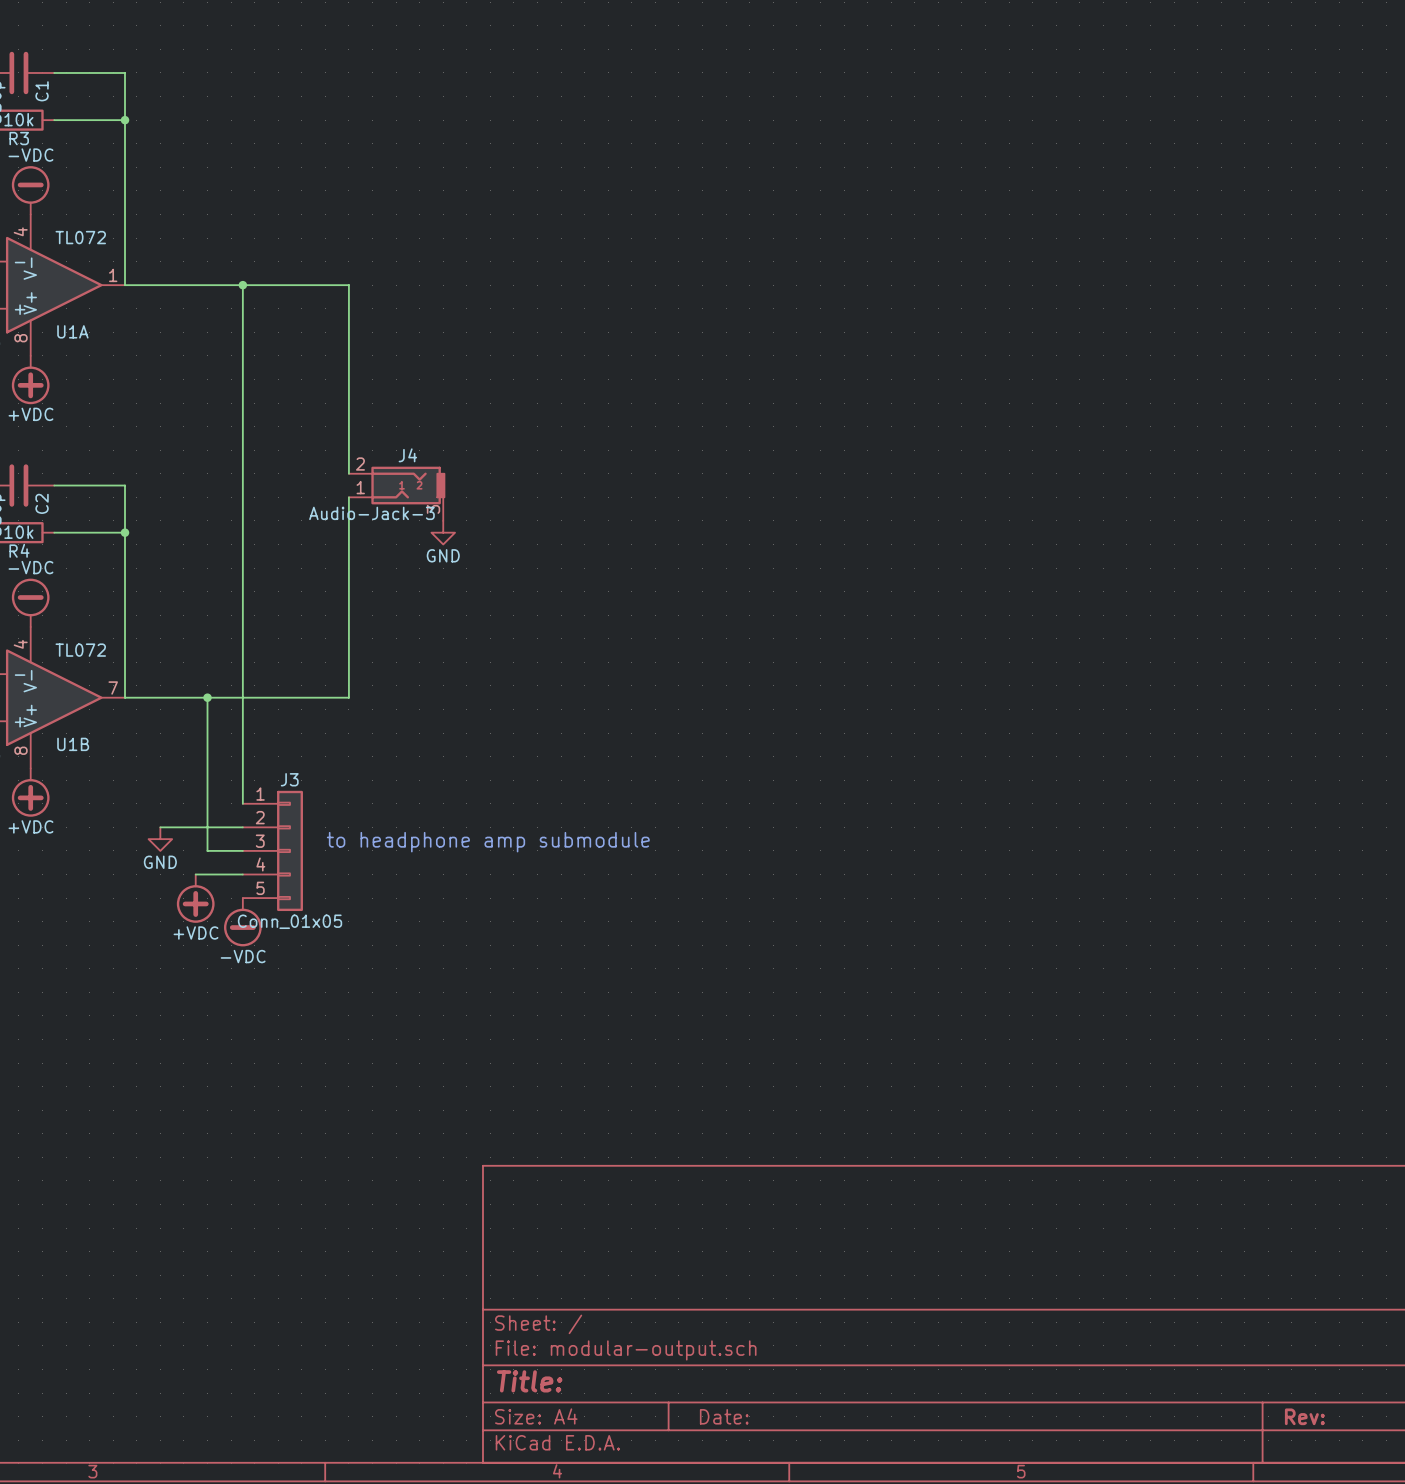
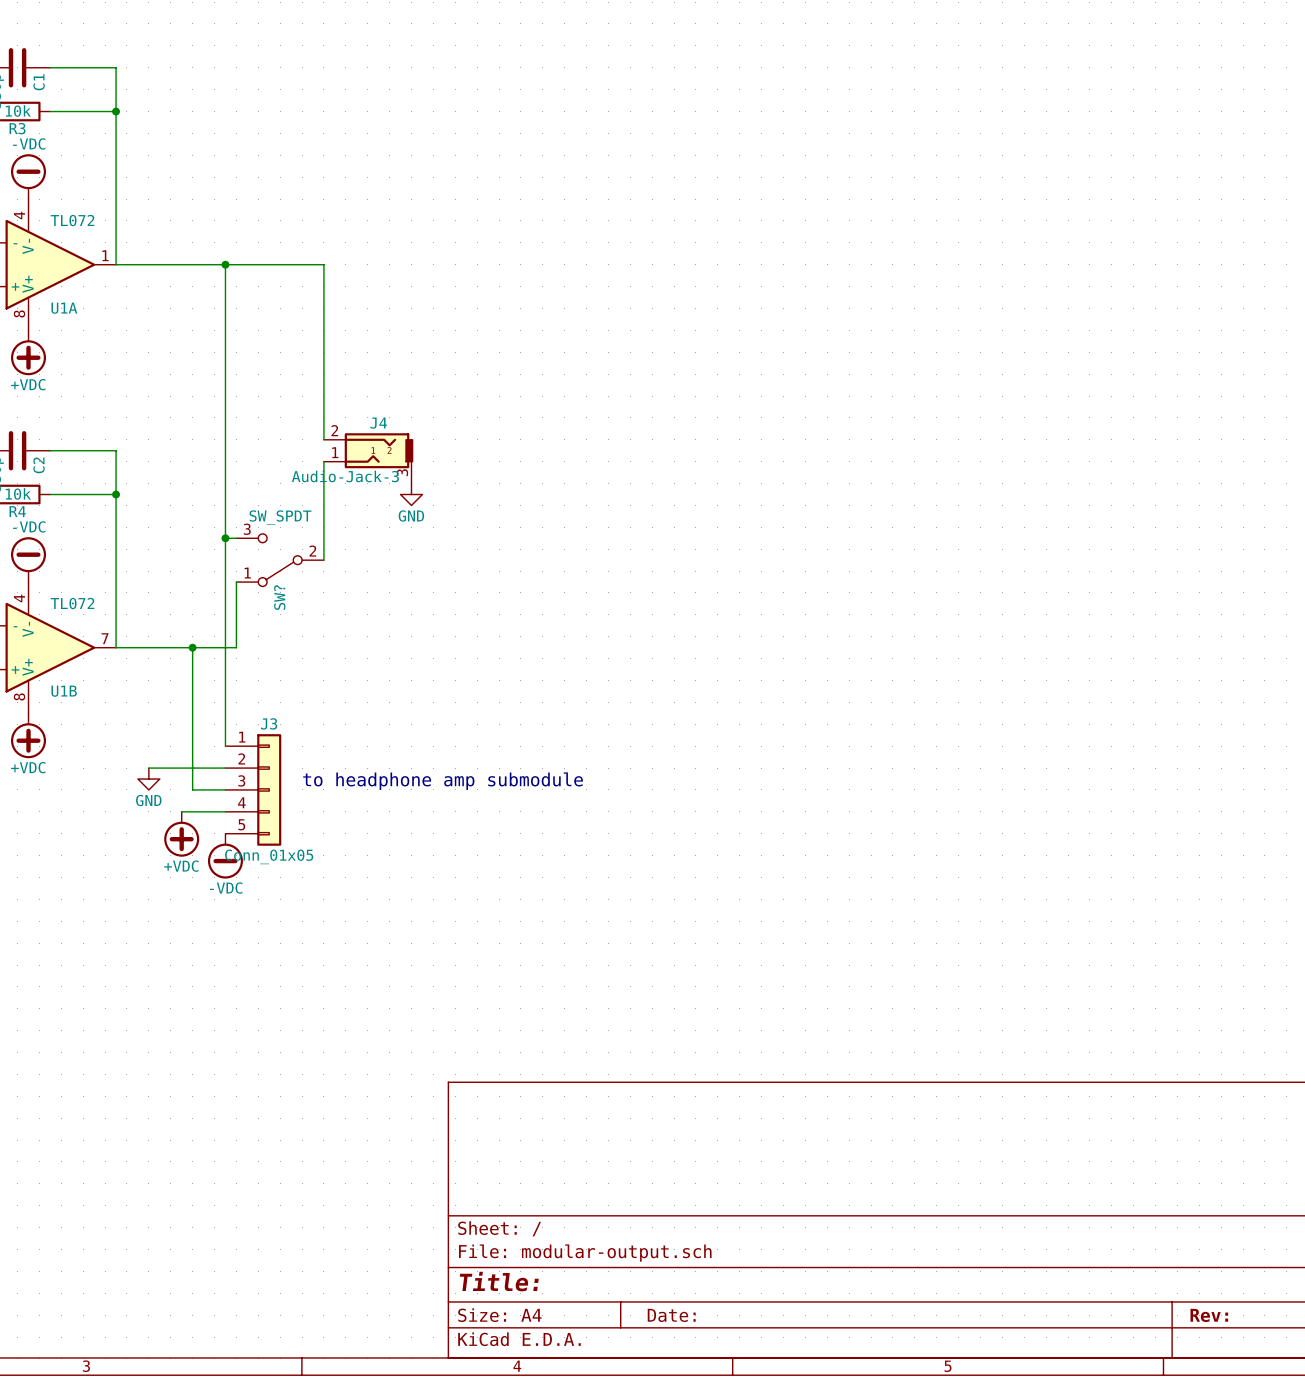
wire: none -> (225, 538) (236, 538)
junction: none -> (225, 538)
SW?: none -> SW_SPDT (280, 560)
wire: (348, 603) (348, 697) (254, 697) -> (236, 582) (236, 647)

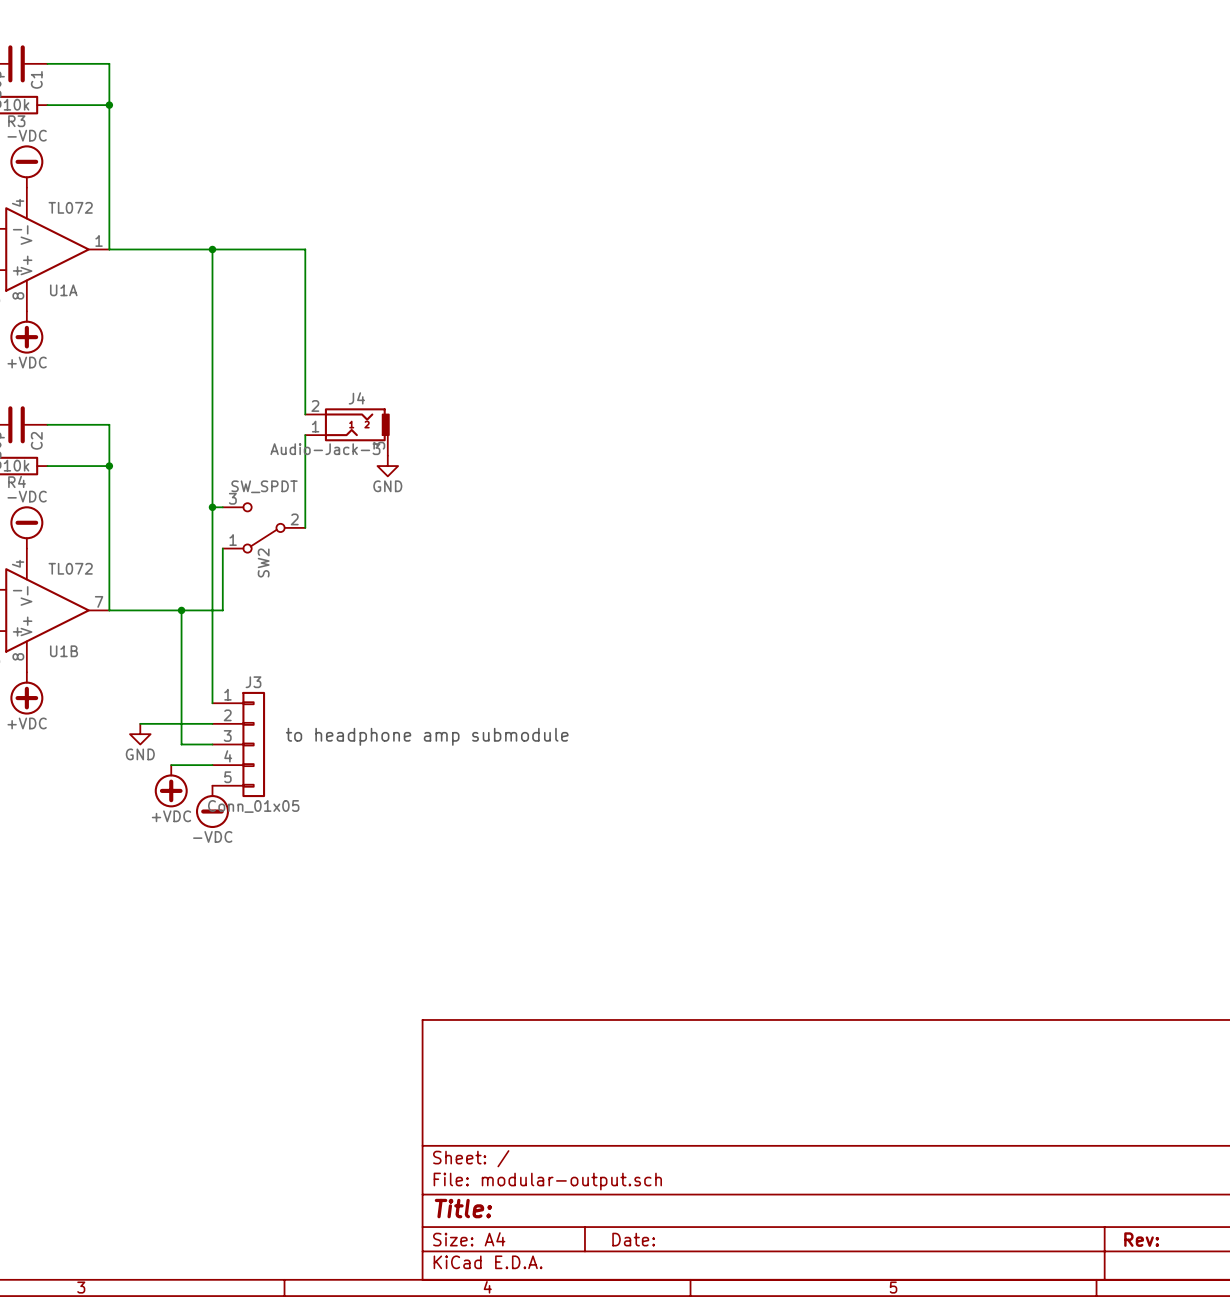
SW? name: SW? (279, 597) -> SW2 (263, 562)

